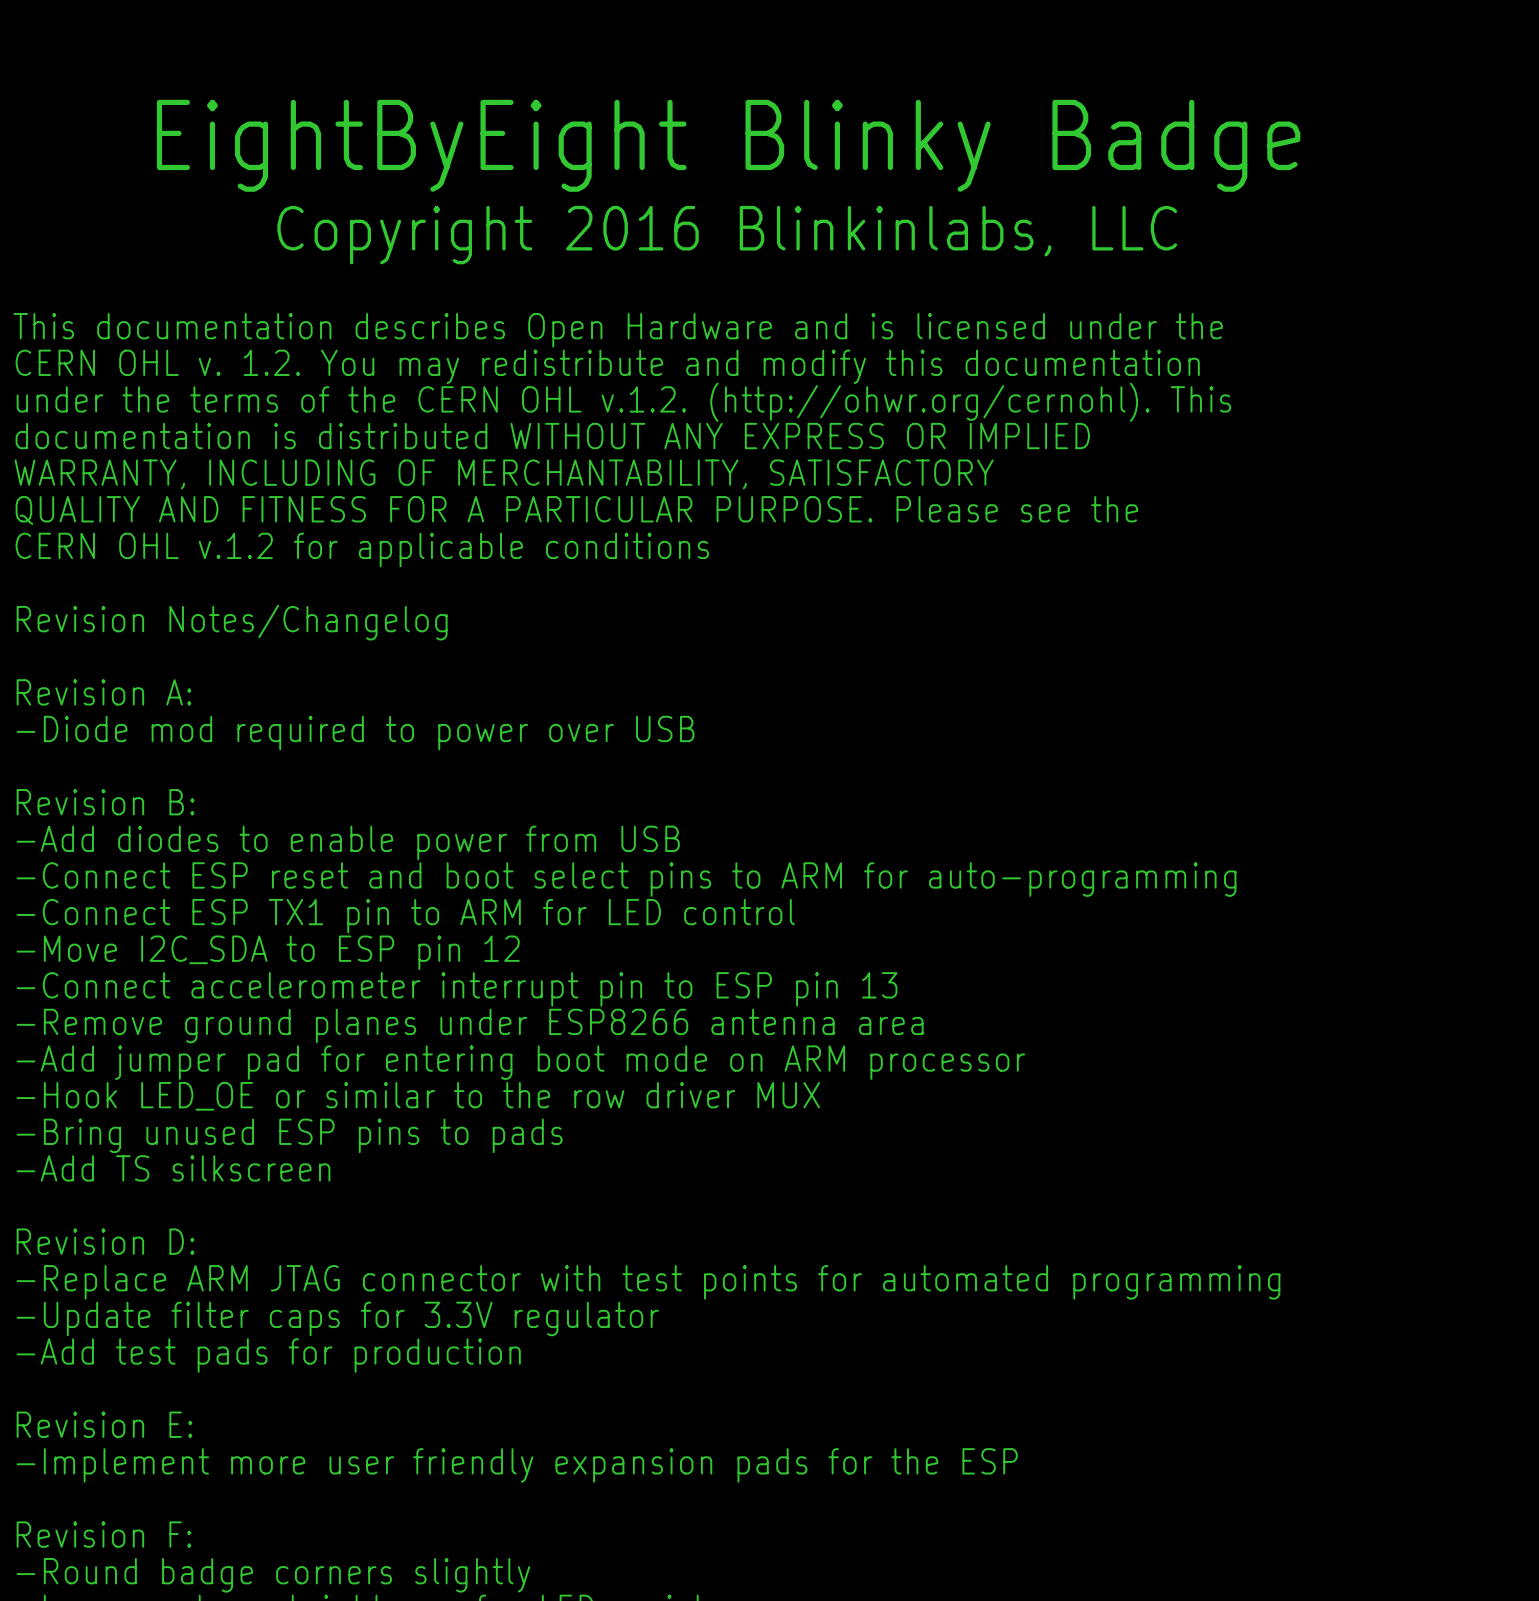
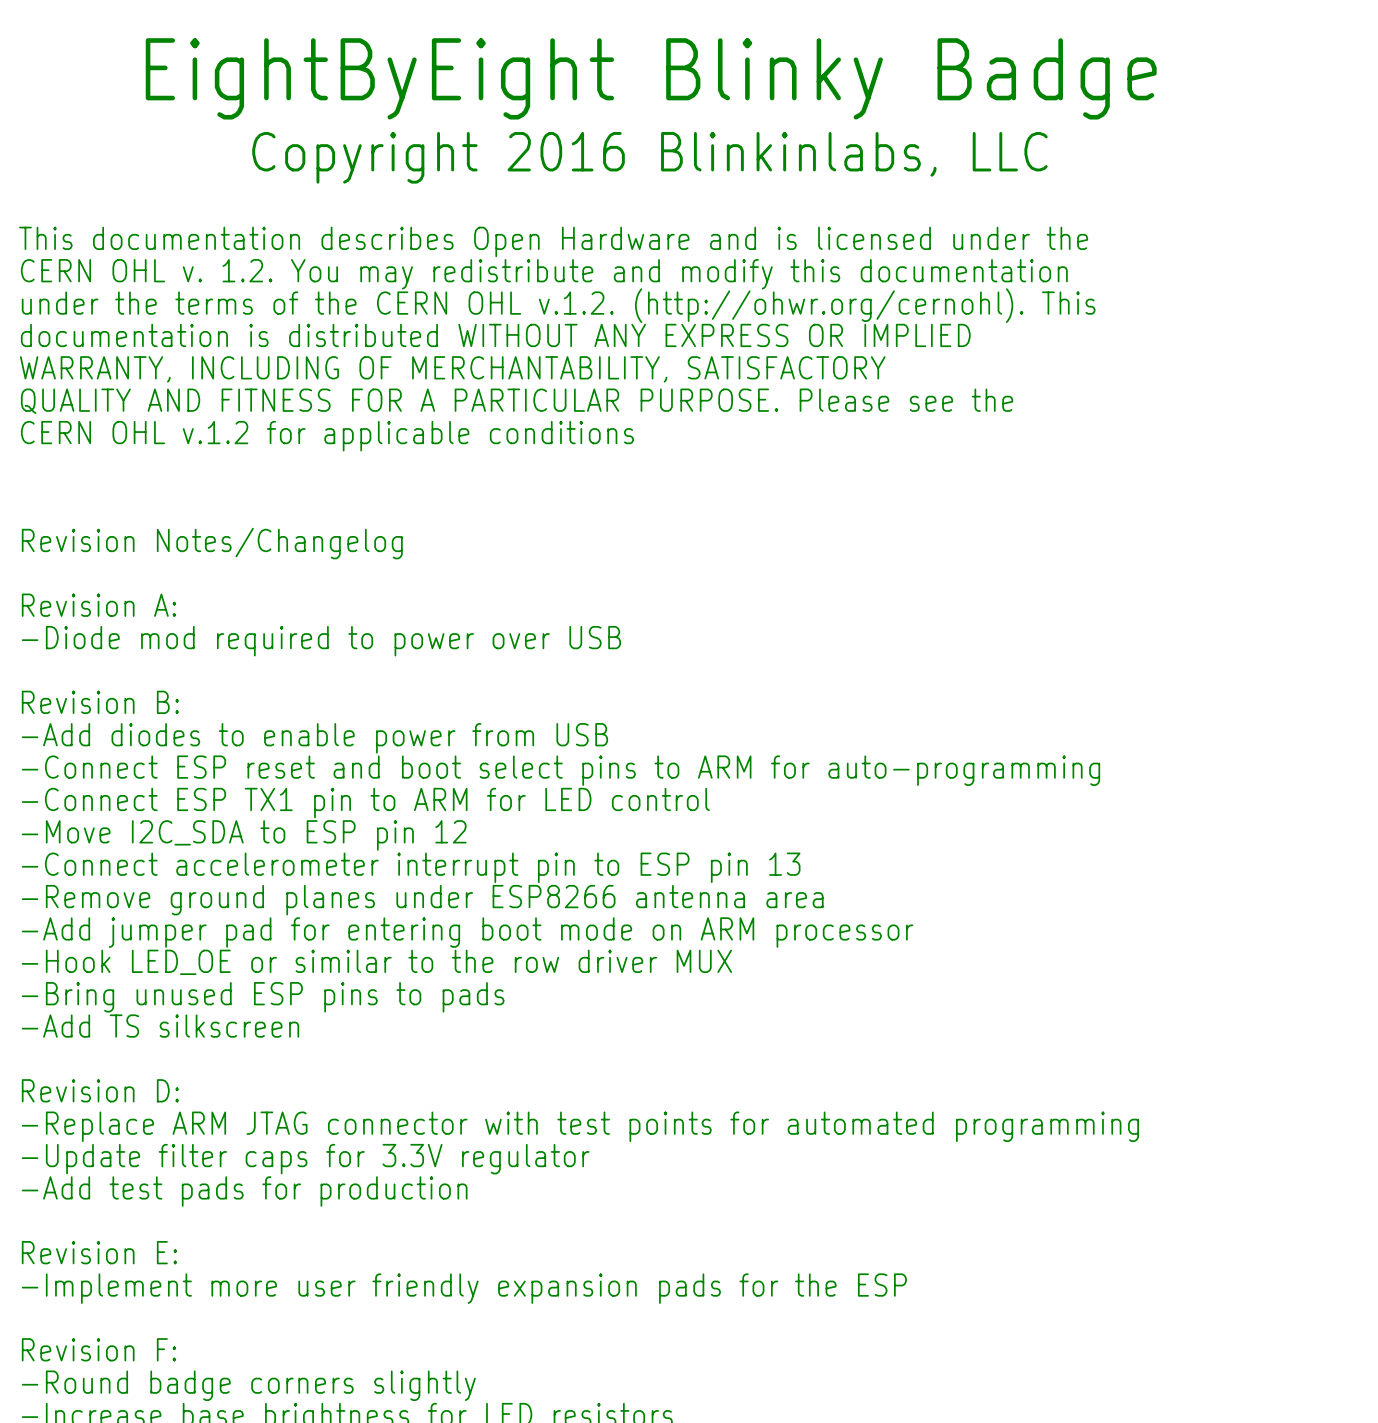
text position: EightByEight Blinky Badge (728, 145) -> EightByEight Blinky Badge (651, 78)
text position: Copyright 2016 Blinkinlabs, LLC (727, 235) -> Copyright 2016 Blinkinlabs, LLC (649, 157)
text position: This documentation describes Open Hardware and is licensed under the (618, 330) -> This documentation describes Open Hardware and is licensed under the (553, 241)
text position: CERN OHL v. 1.2. You may redistribute and modify this documentation (607, 366) -> CERN OHL v. 1.2. You may redistribute and modify this documentation (544, 274)
text position: under the terms of the CERN OHL v.1.2. (http://ohwr.org/cernohl). This (623, 402) -> under the terms of the CERN OHL v.1.2. (http://ohwr.org/cernohl). This (558, 305)
text position: documentation is distributed WITHOUT ANY EXPRESS OR IMPLIED (552, 436) -> documentation is distributed WITHOUT ANY EXPRESS OR IMPLIED (495, 335)
text position: WARRANTY, INCLUDING OF MERCHANTABILITY, SATISFACTORY (504, 474) -> WARRANTY, INCLUDING OF MERCHANTABILITY, SATISFACTORY (452, 369)
text position: QUALITY AND FITNESS FOR A PARTICULAR PURPOSE. Please see the (576, 510) -> QUALITY AND FITNESS FOR A PARTICULAR PURPOSE. Please see the (517, 401)
text position: CERN OHL v.1.2 for applicable conditions (362, 549) -> CERN OHL v.1.2 for applicable conditions (327, 436)

